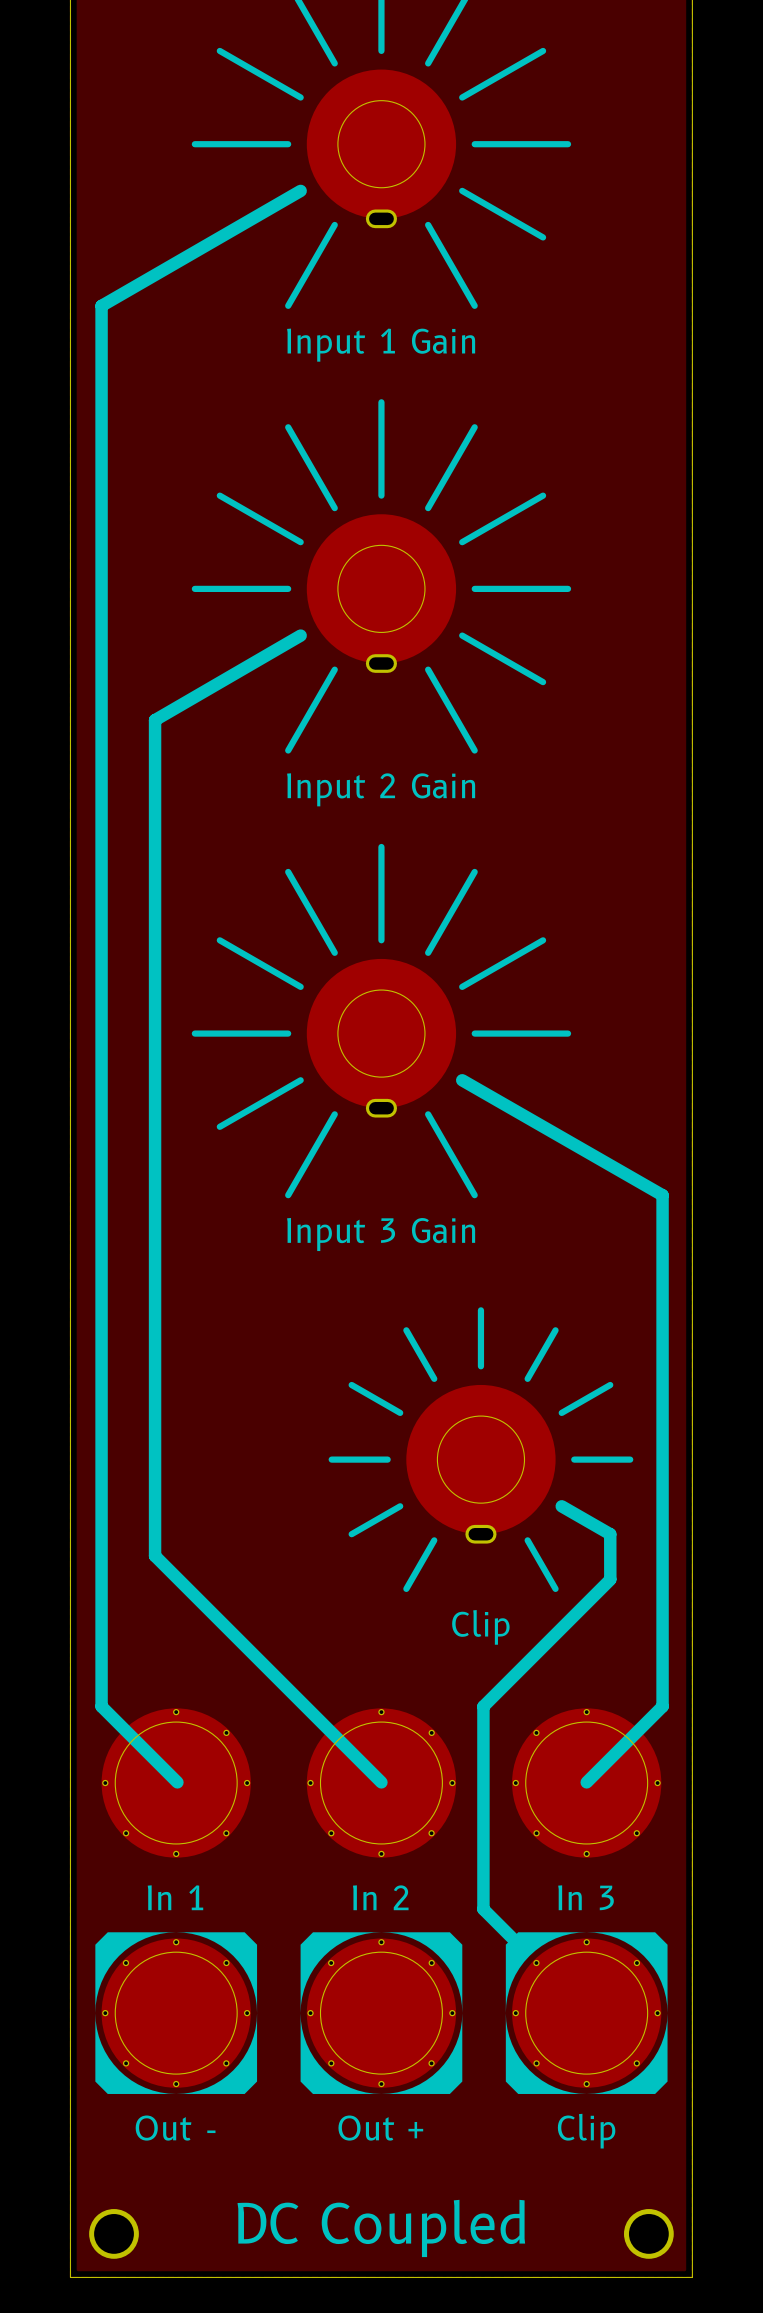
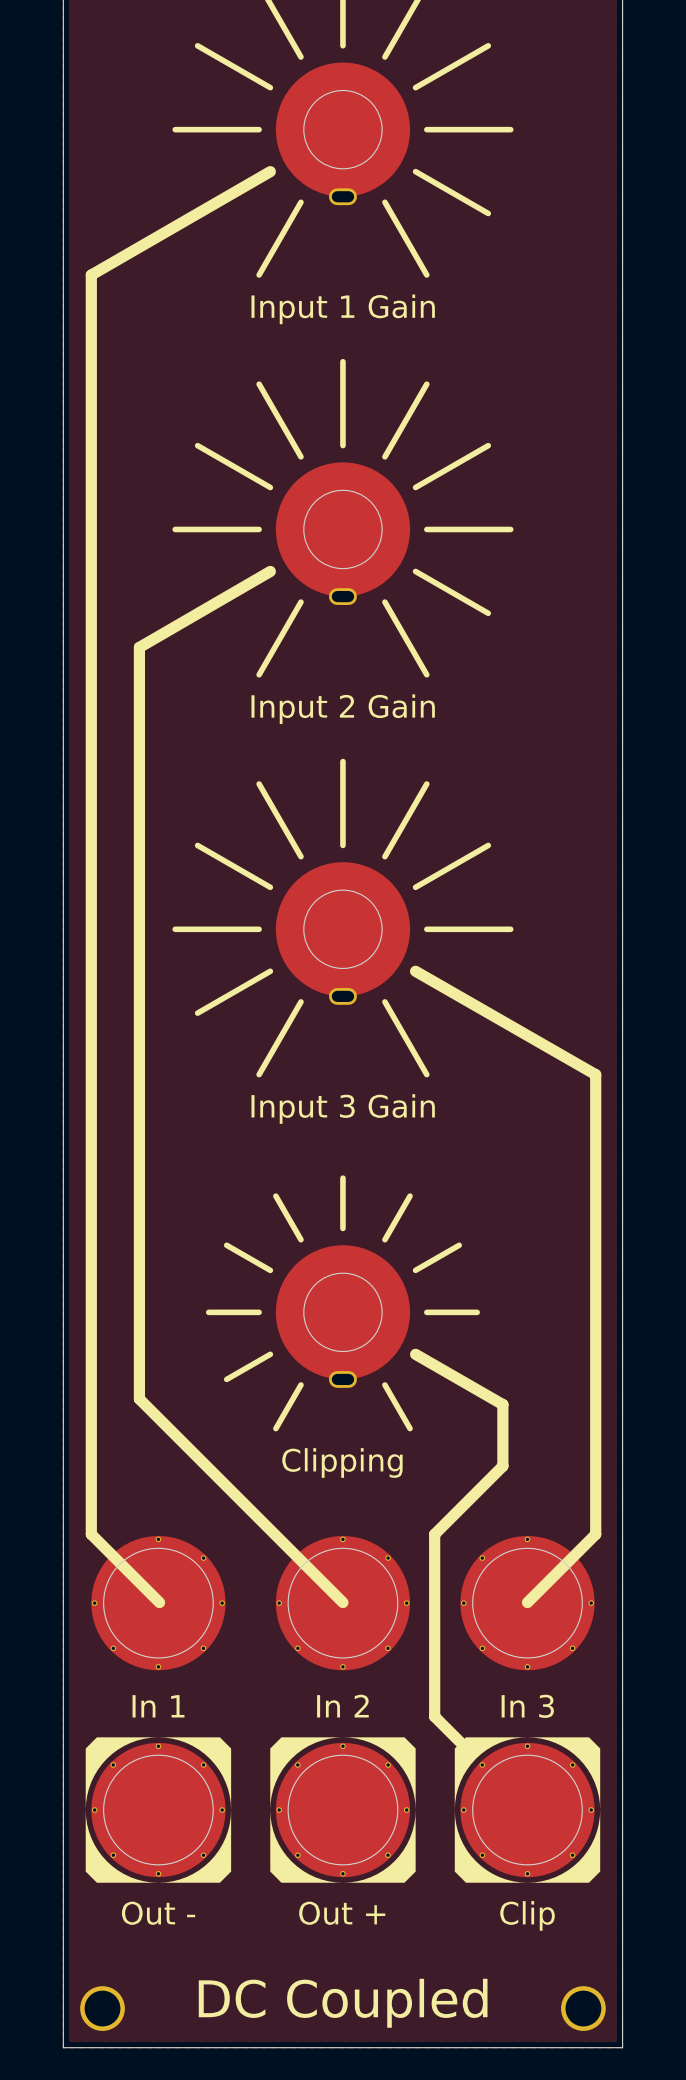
part: none -> Clipping (342, 1303)
part: Clip (480, 1449) -> none
line: (561, 1506) (610, 1534) (610, 1579) -> none
line: (610, 1579) (559, 1630) -> (415, 1354) (502, 1404) (502, 1466)

